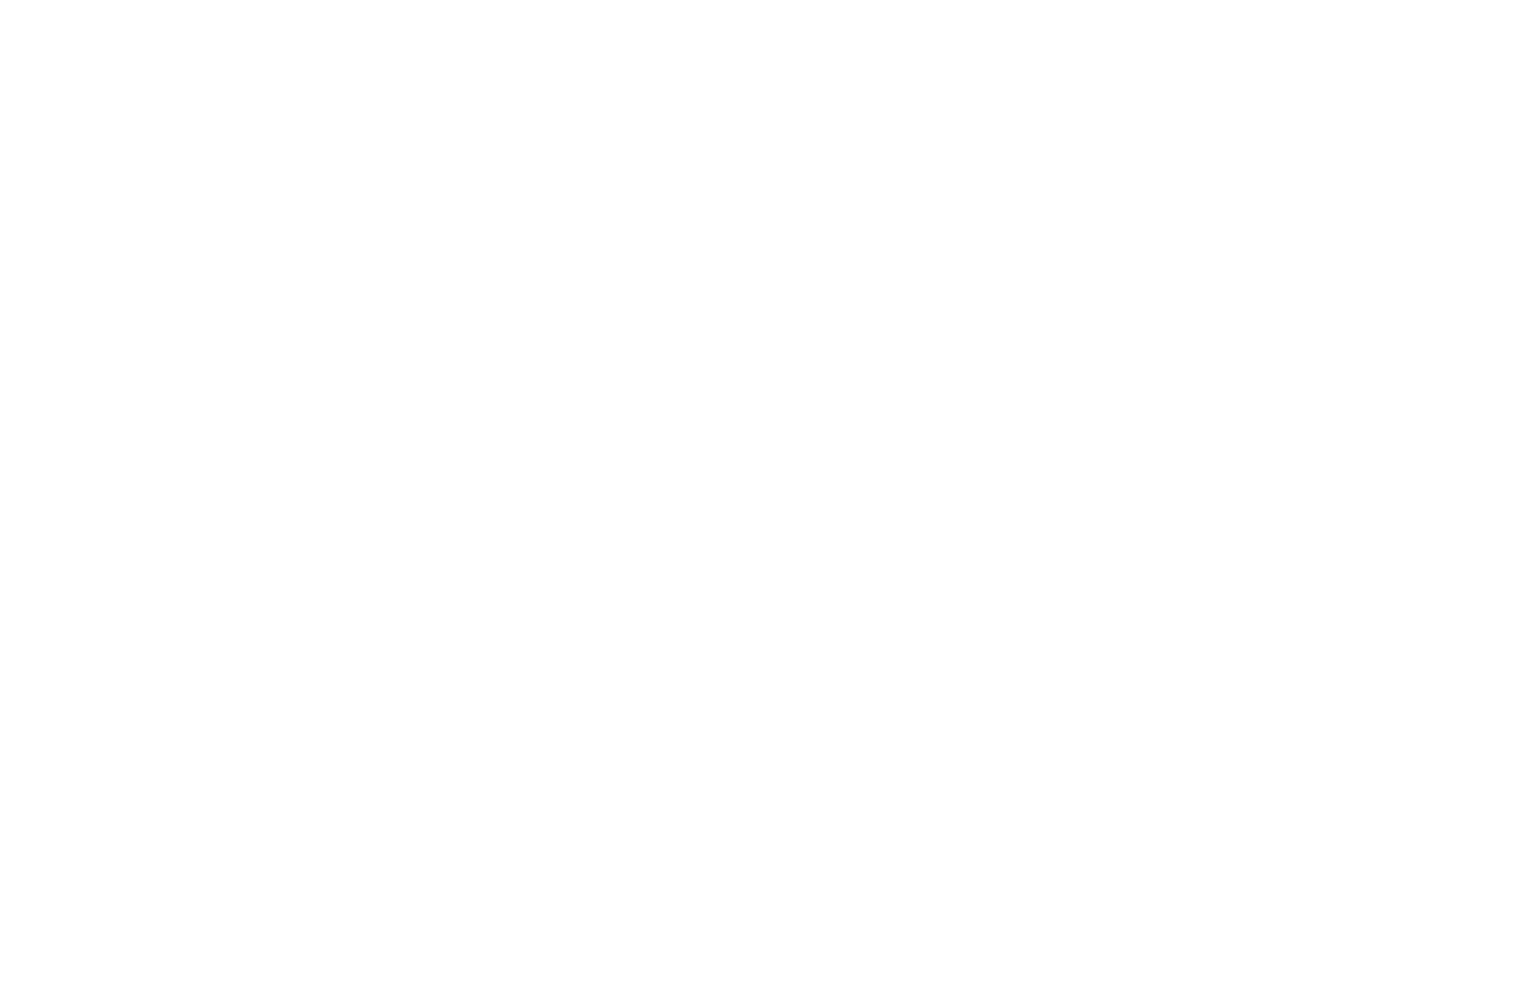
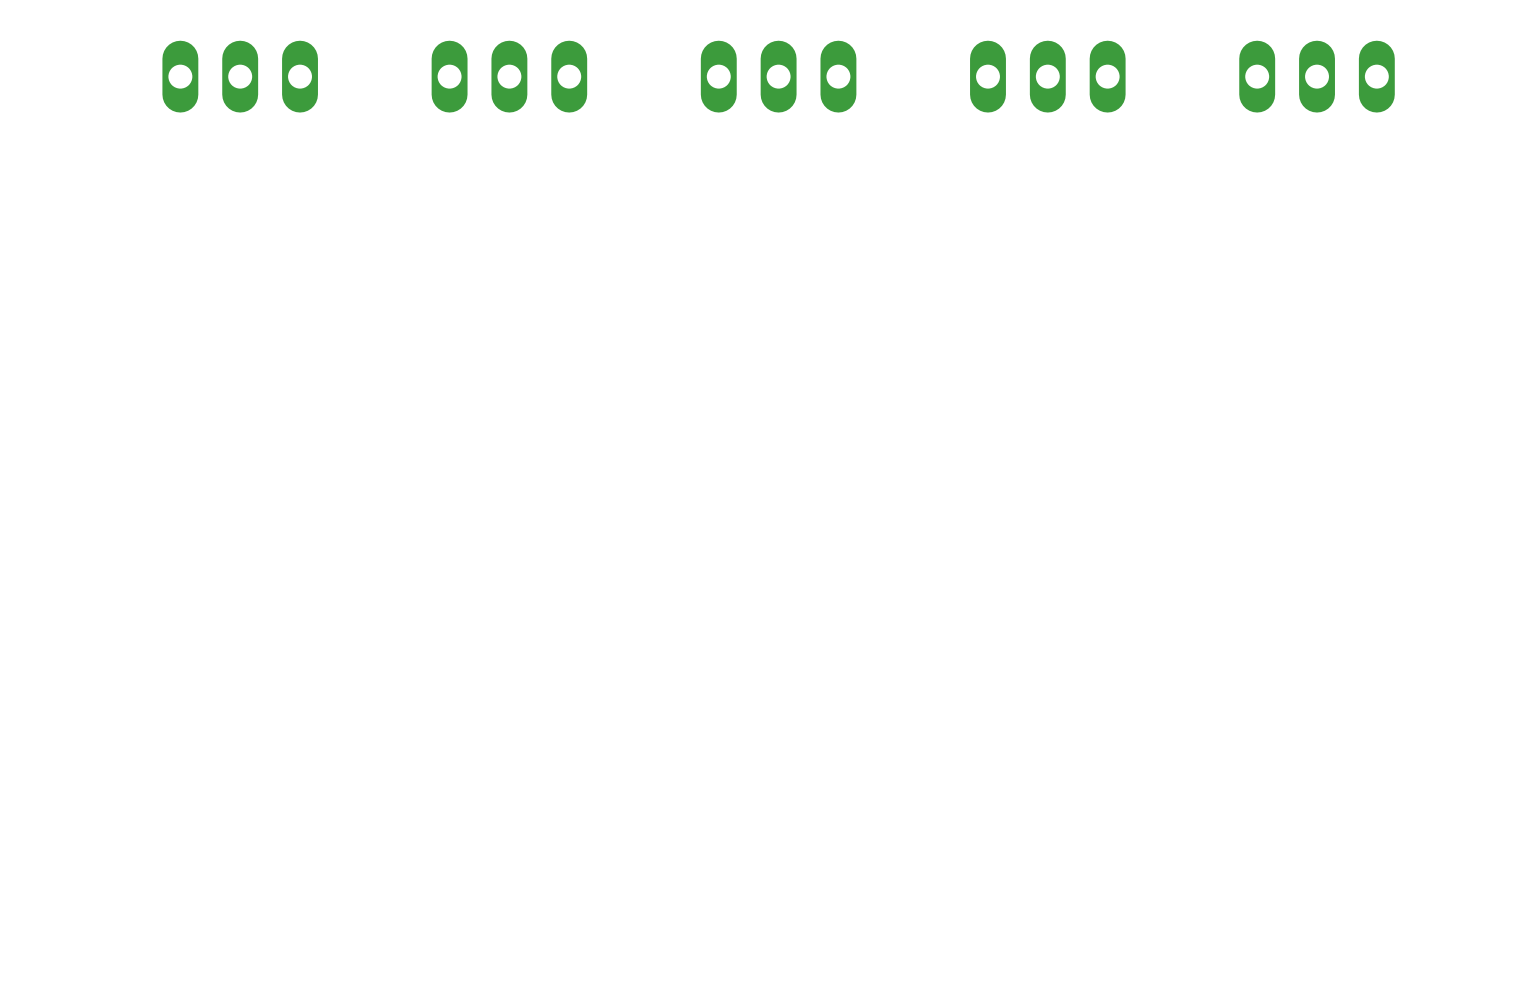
part: none -> (240, 76)
part: none -> (509, 76)
part: none -> (778, 76)
part: none -> (1047, 76)
part: none -> (1317, 76)

